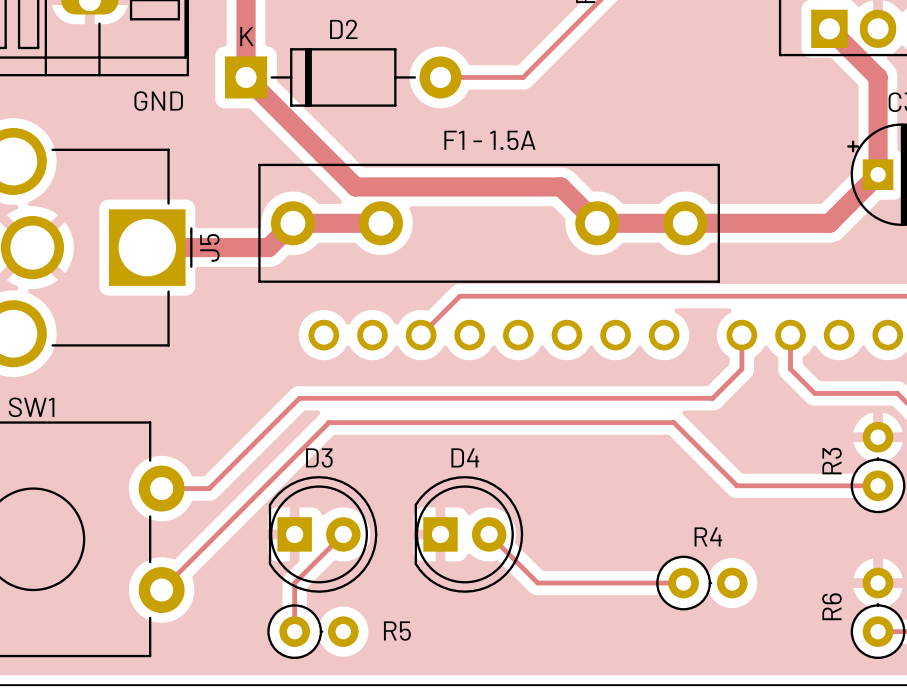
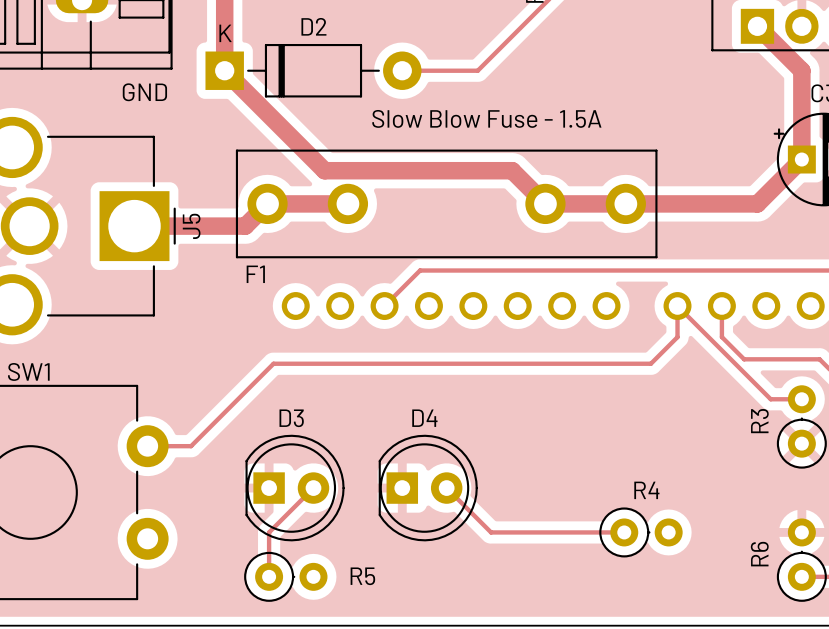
F1 - 1.5A value: none -> Slow Blow Fuse - 1.5A (486, 118)
F1 - 1.5A name: F1 - 1.5A (489, 140) -> F1 (255, 274)
track: none -> (677, 306) (770, 399) (801, 399)
track: (328, 422) (673, 422) (737, 485) (878, 485) -> none
track: (328, 422) (161, 590) -> none

